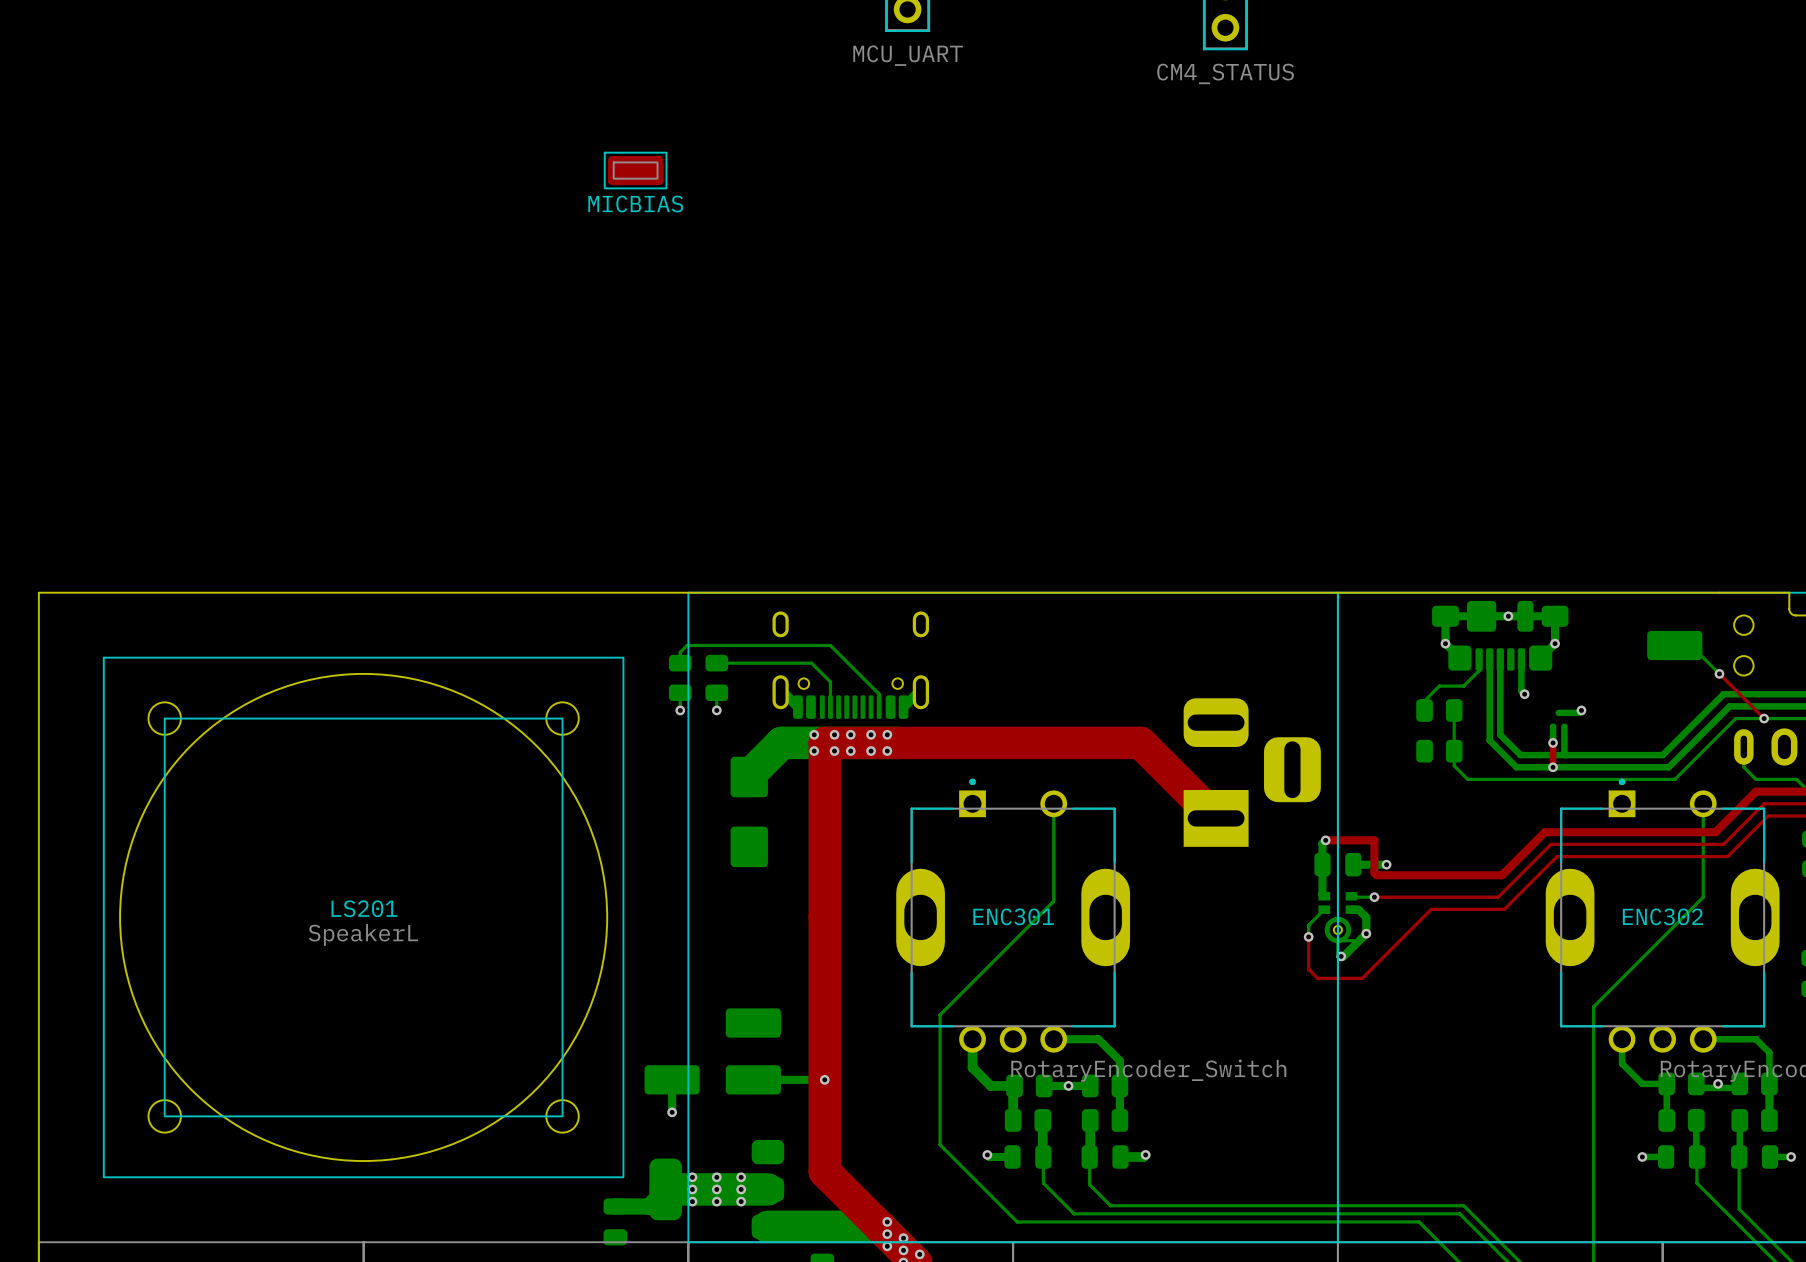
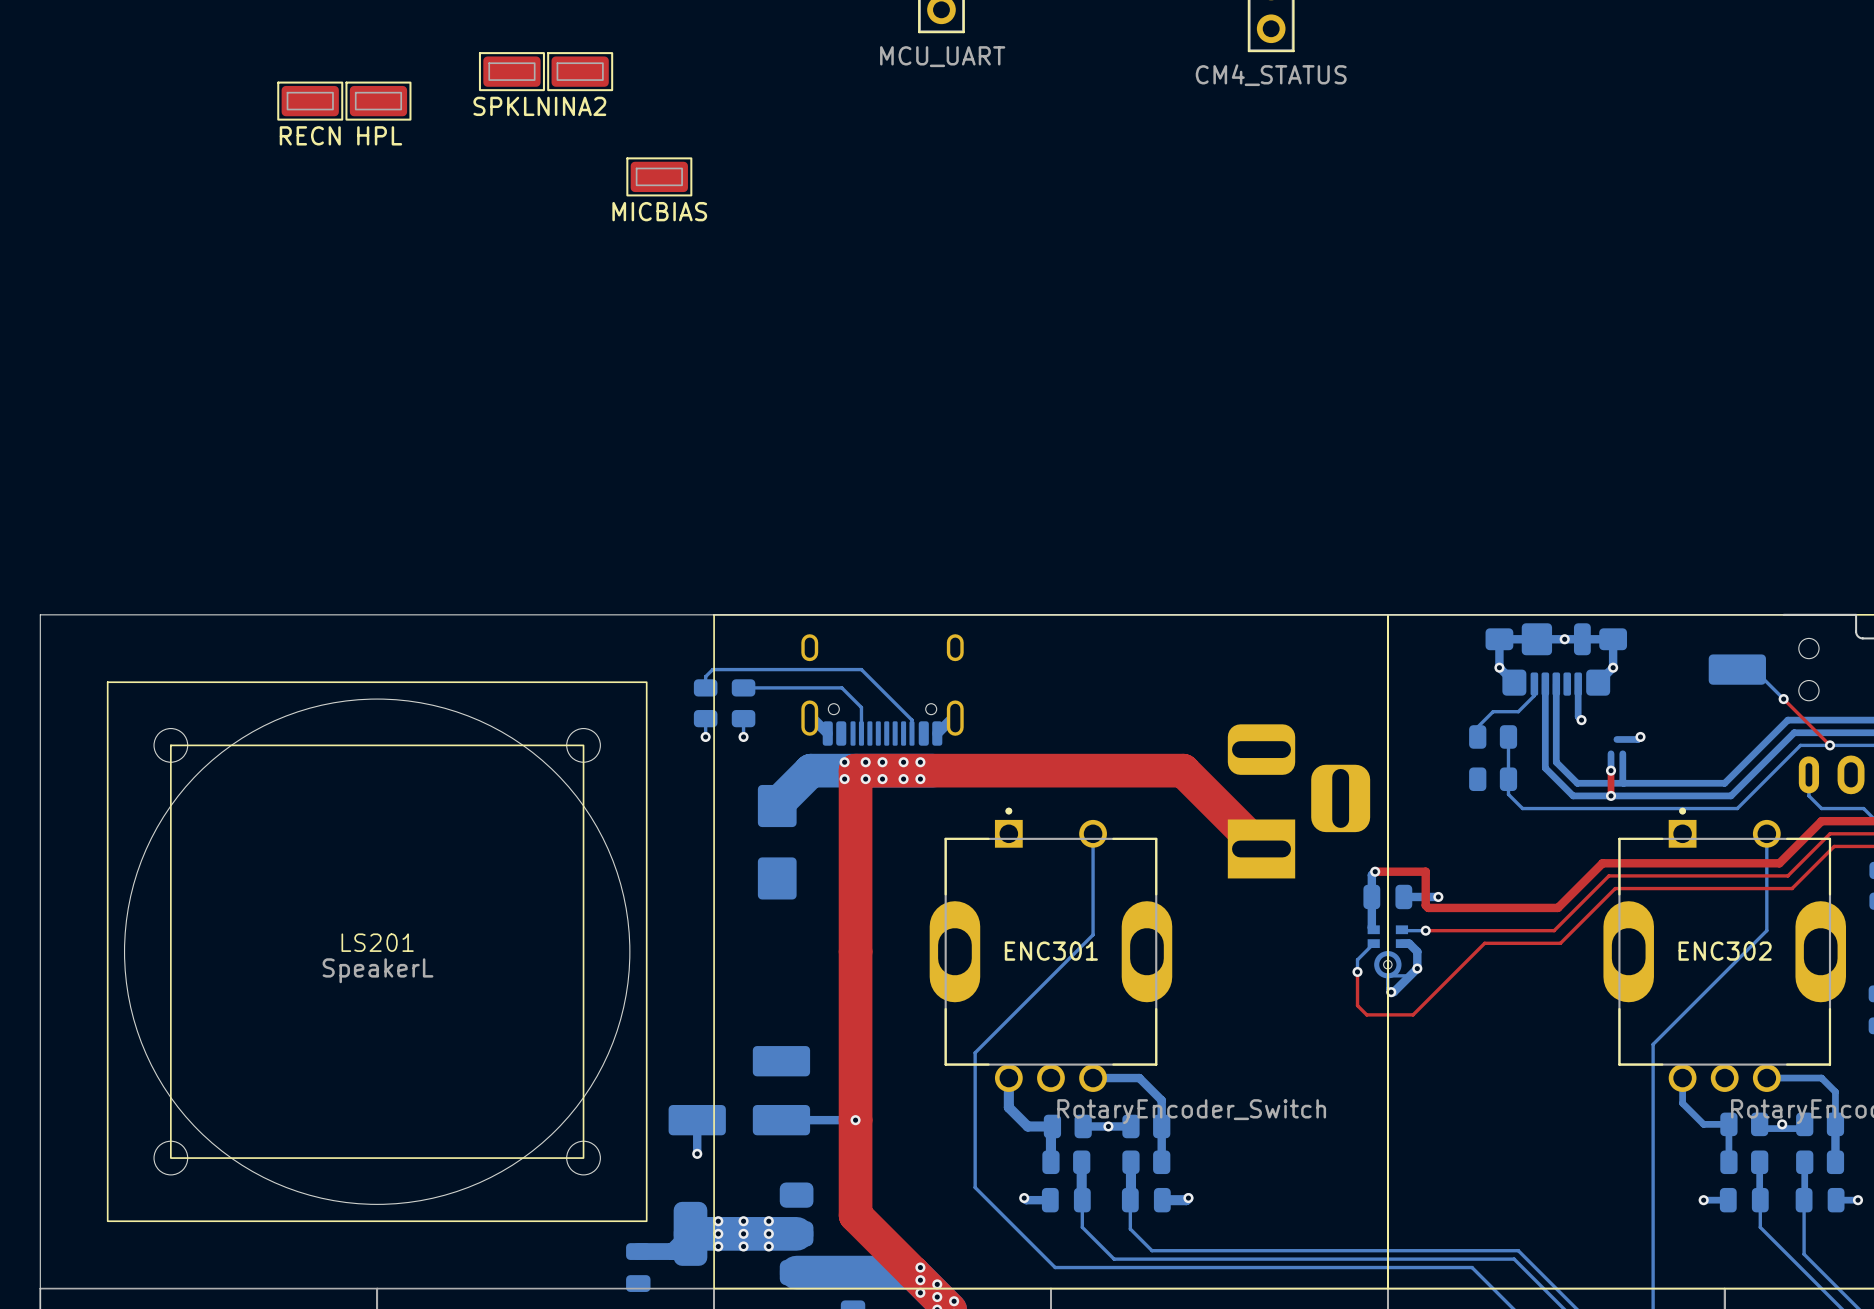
part: none -> SPKLN (511, 71)
part: none -> INA2 (580, 71)
part: none -> RECN (310, 101)
part: none -> HPL (378, 101)

